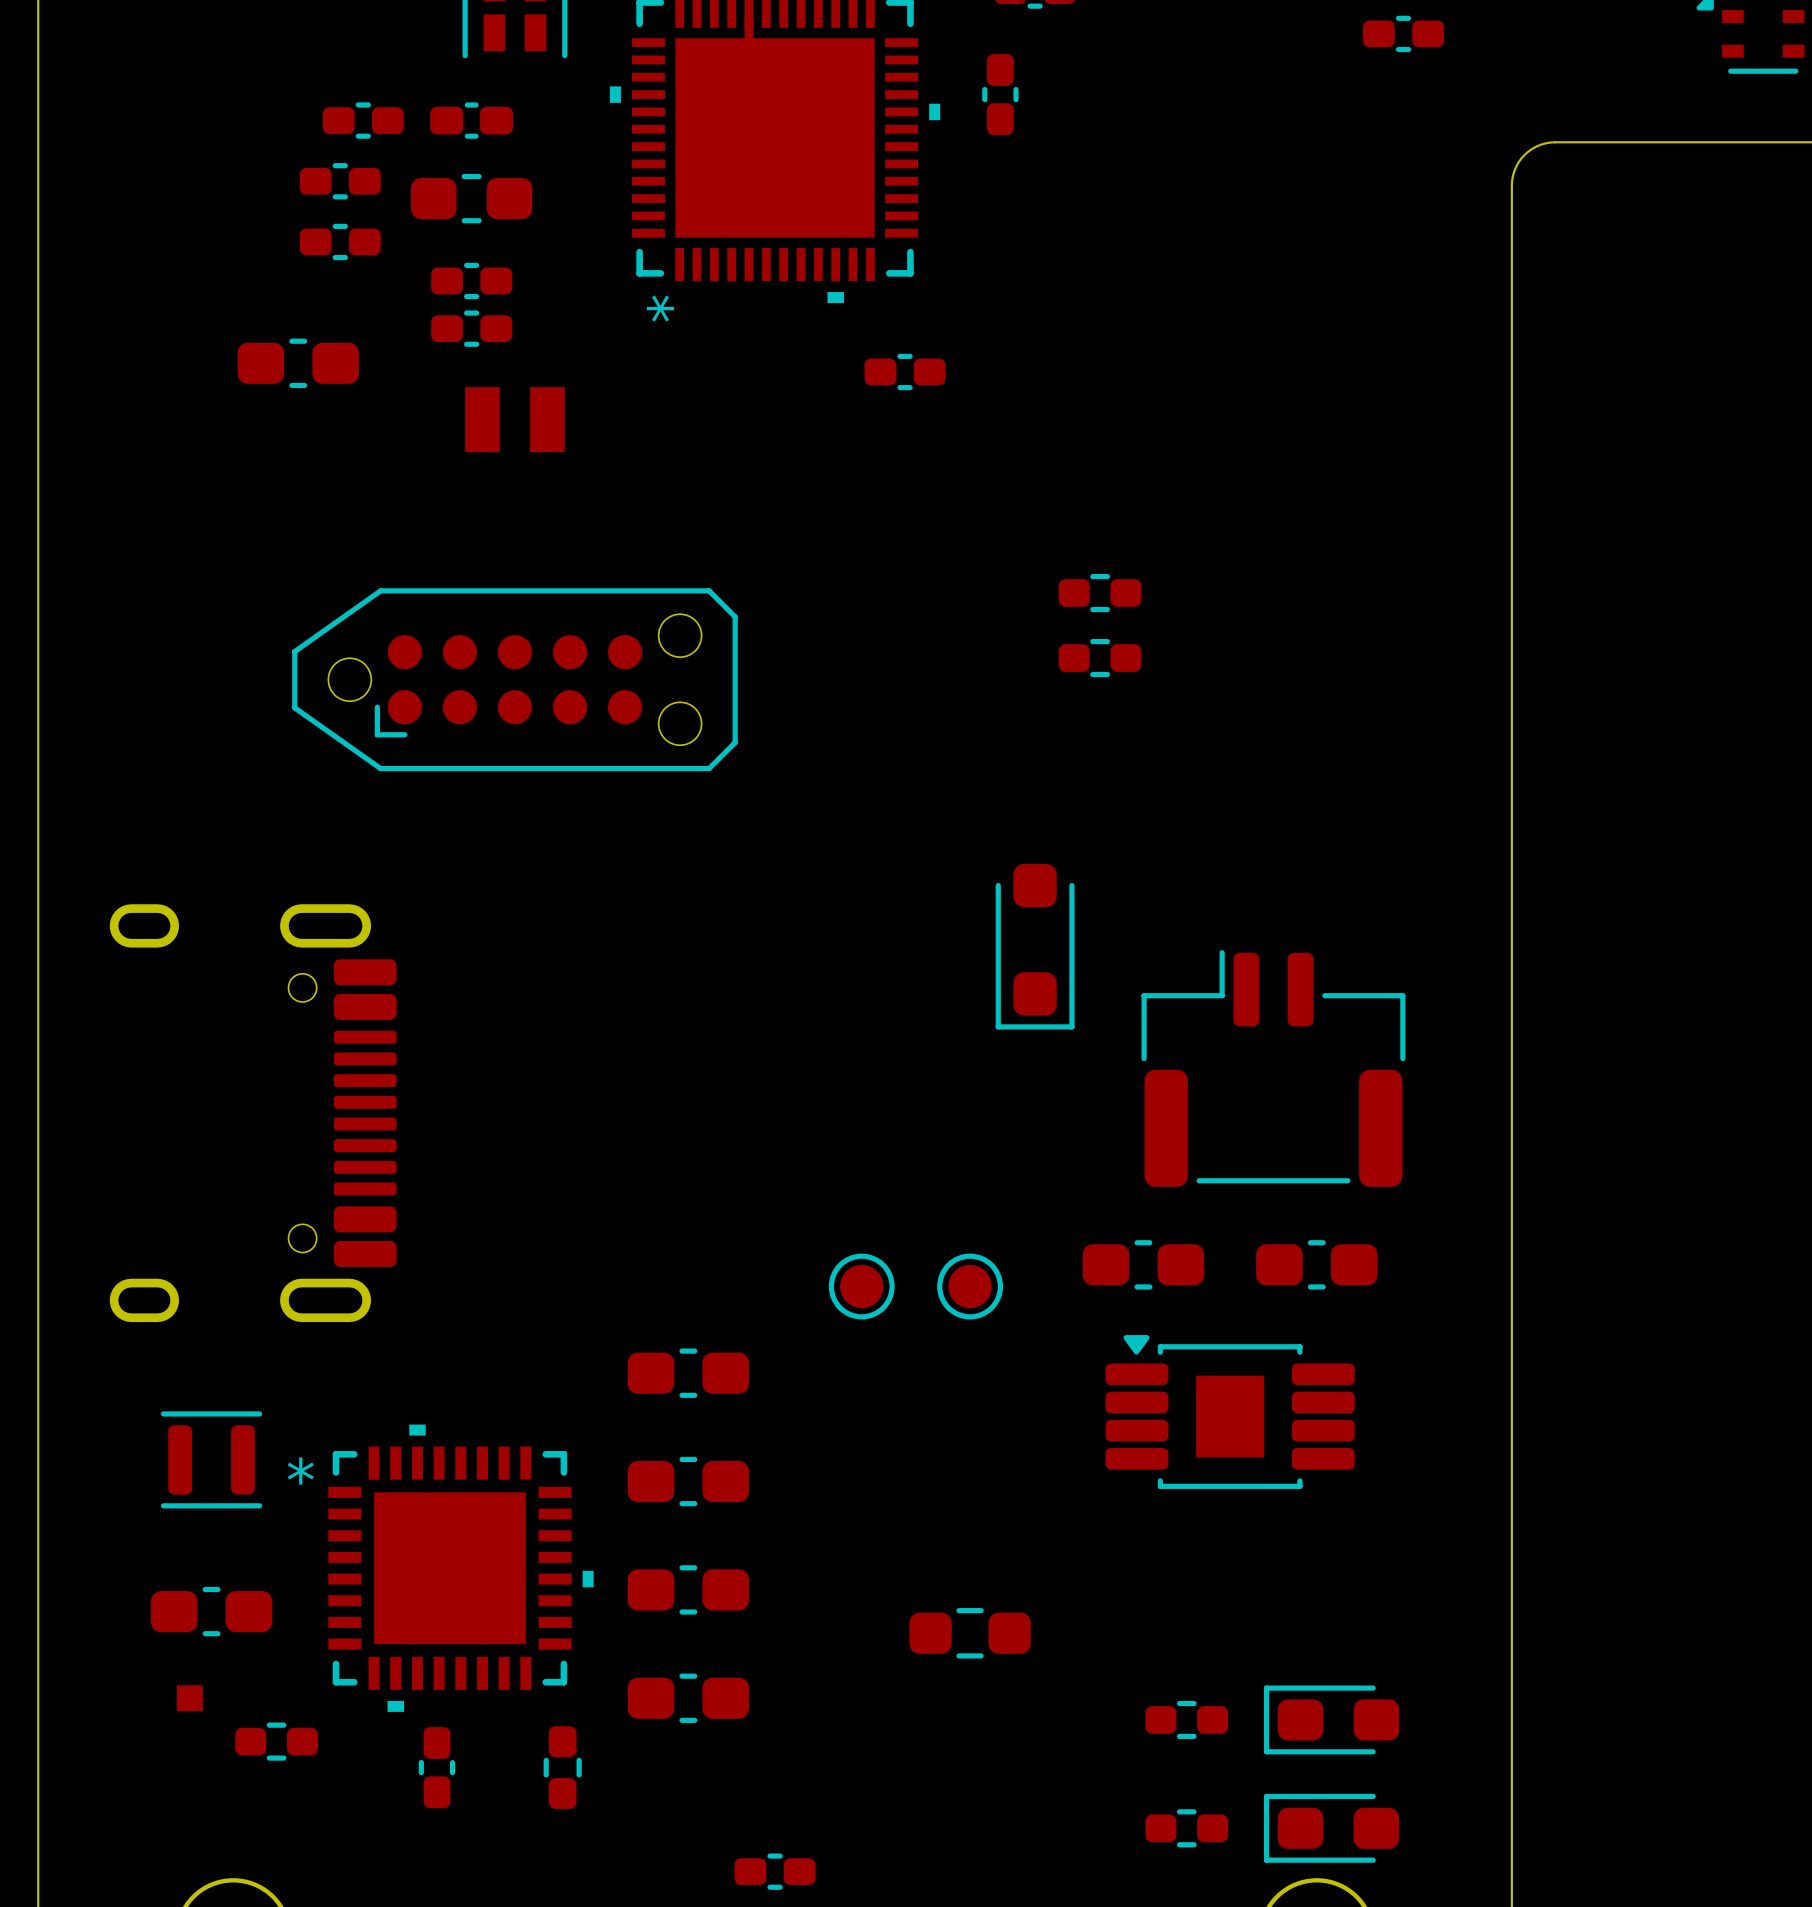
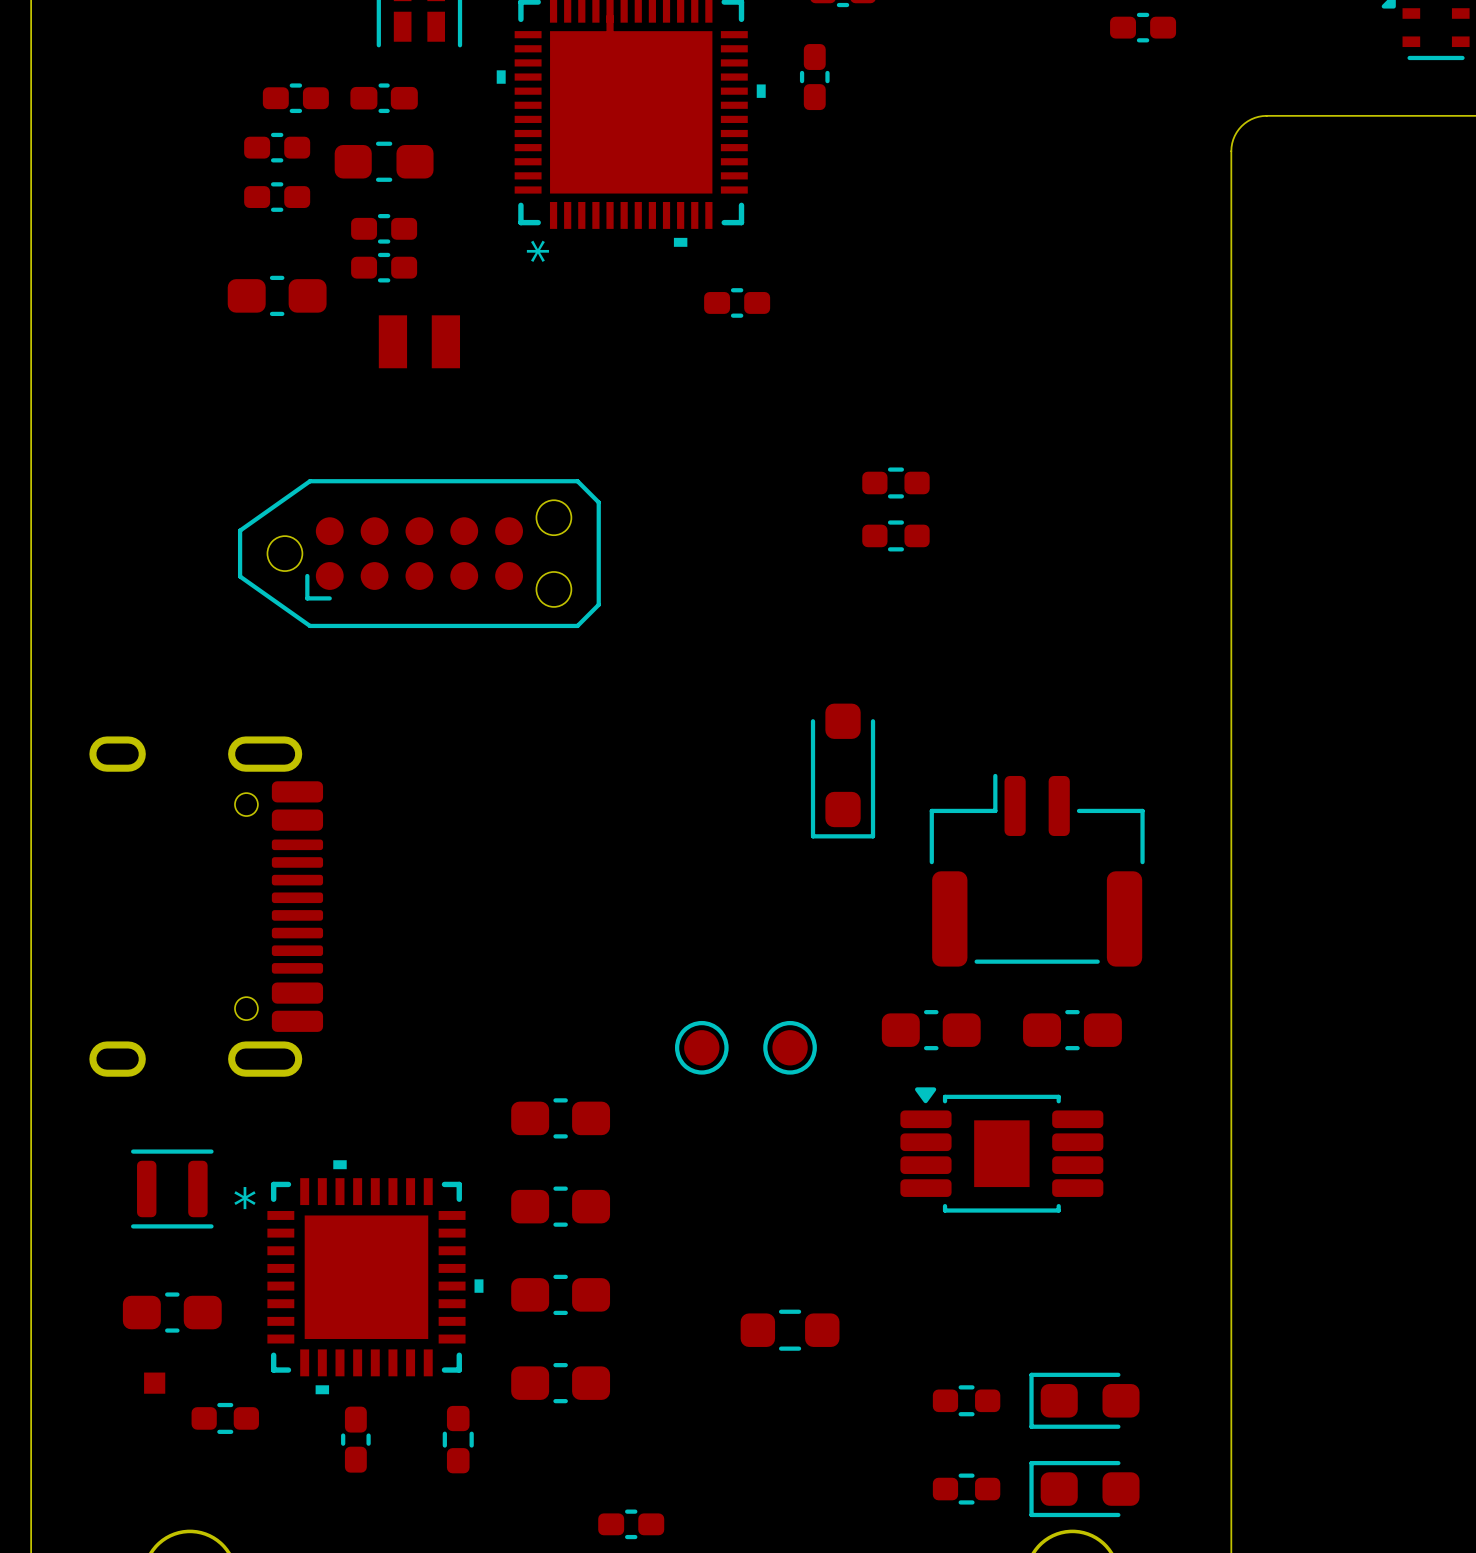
part position: (298, 363) -> (277, 295)

